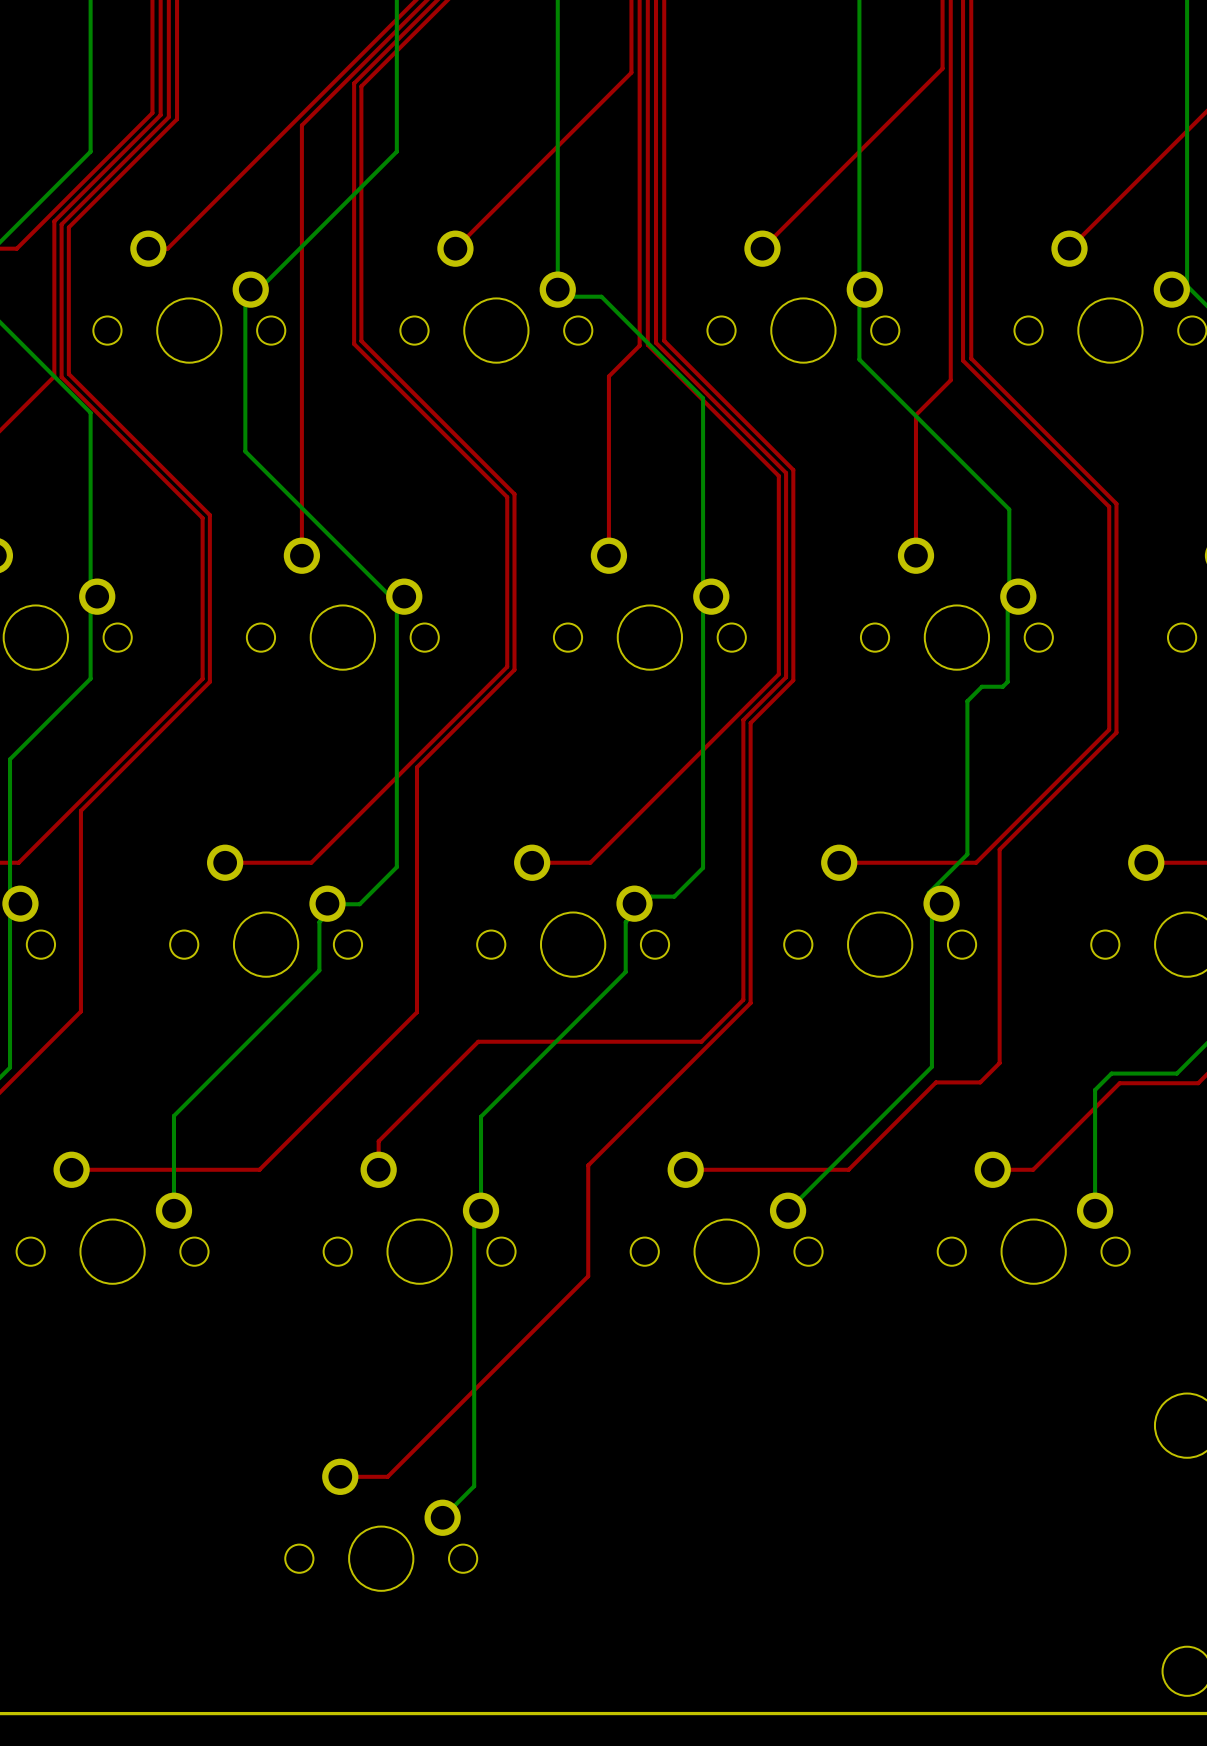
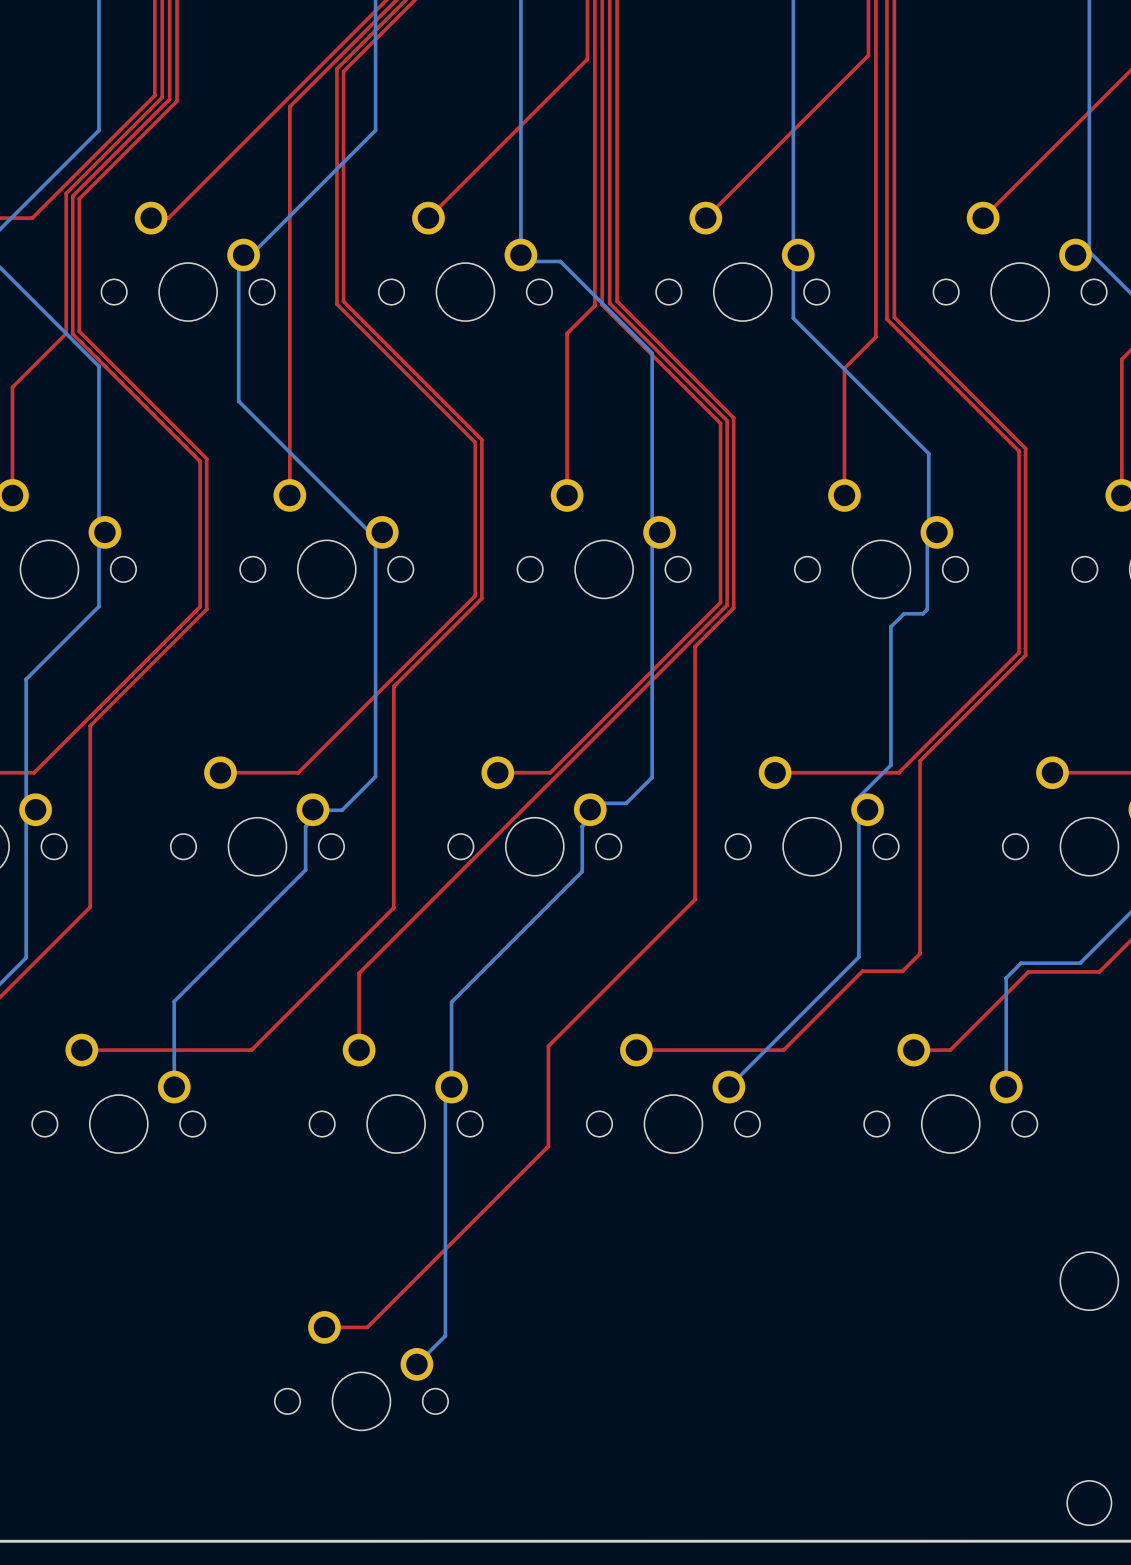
top track: (743, 720) (743, 999) (701, 1041) (478, 1041) (378, 1141) -> (688, 643) (359, 973) (359, 1024)

